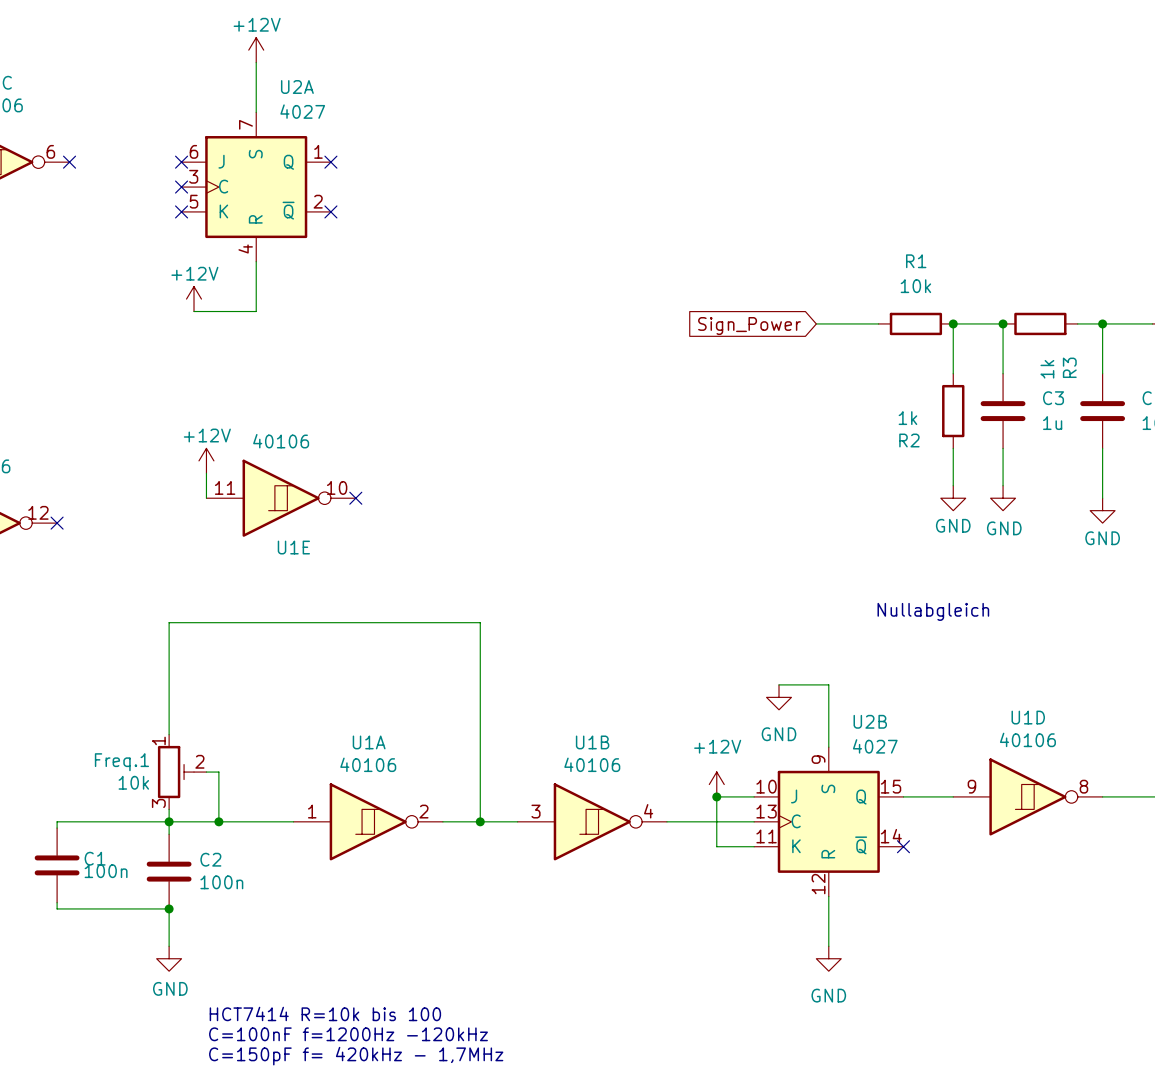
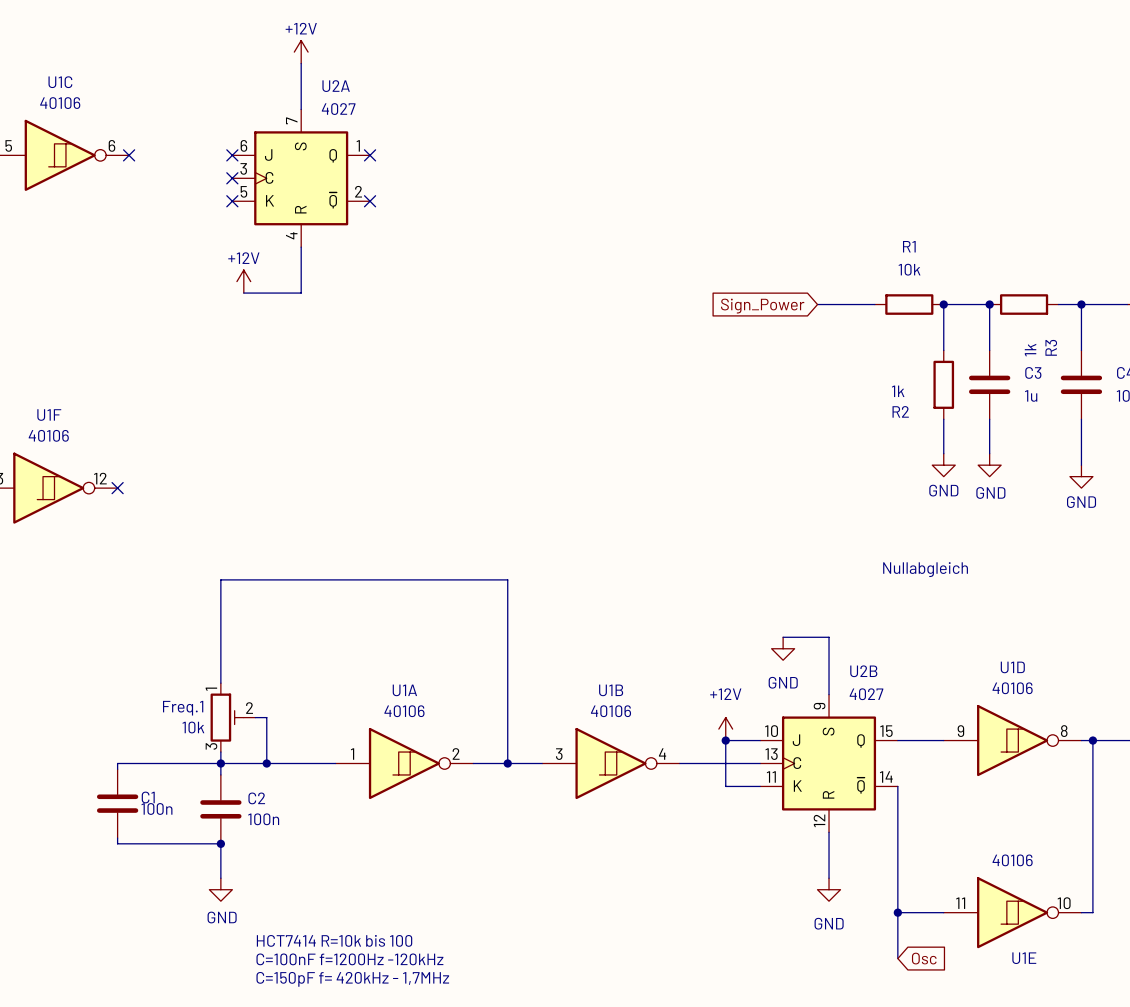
power symbol: +12V (206, 460) -> none
wire: (206, 473) (206, 498) -> none
U1E position: (281, 498) -> (1012, 912)
no-connect mark: (355, 498) -> none
wire: none -> (1092, 740) (1092, 912) (1081, 912)
junction: none -> (1092, 740)
wire: none -> (897, 786) (897, 958)
no-connect mark: (903, 846) -> none
wire: none -> (897, 912) (943, 912)
junction: none -> (897, 912)
global label: none -> Osc (924, 958)

